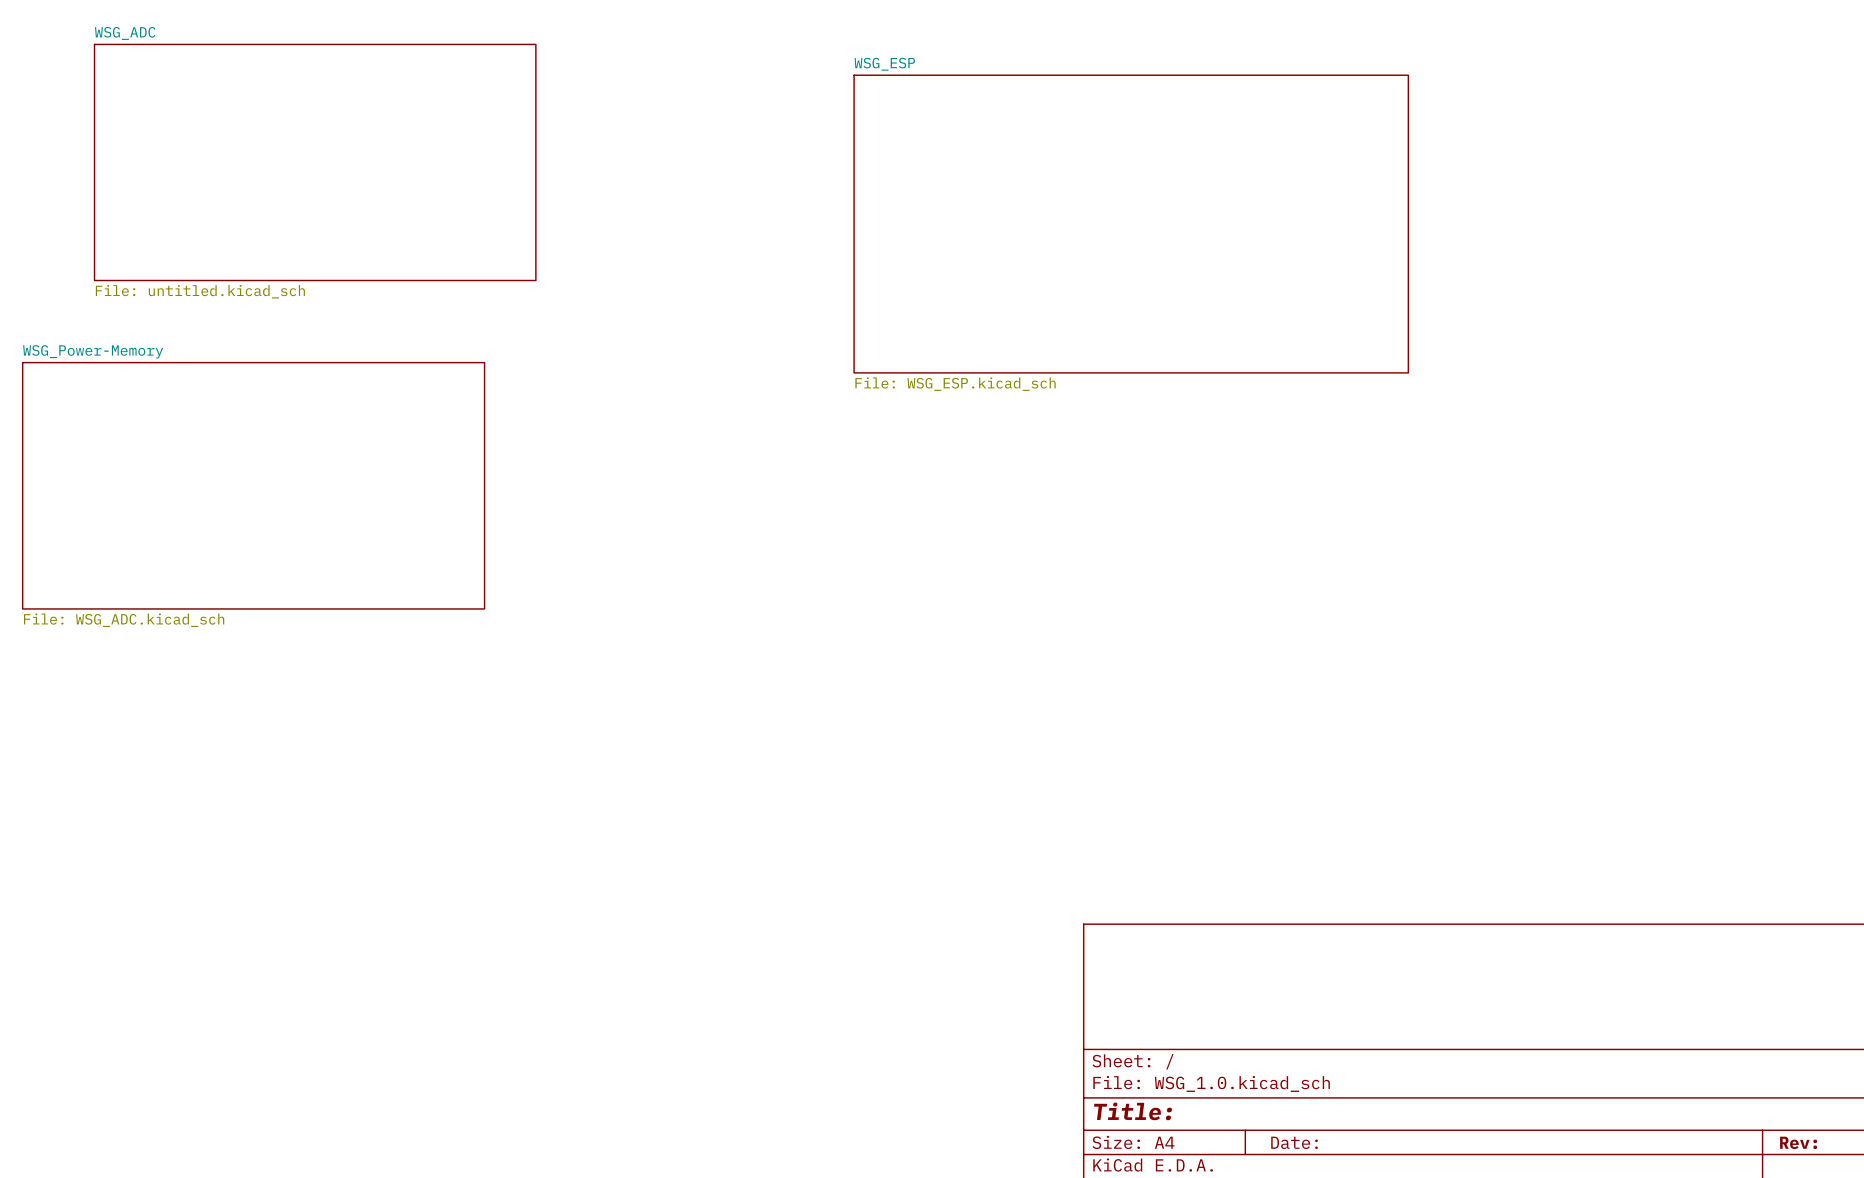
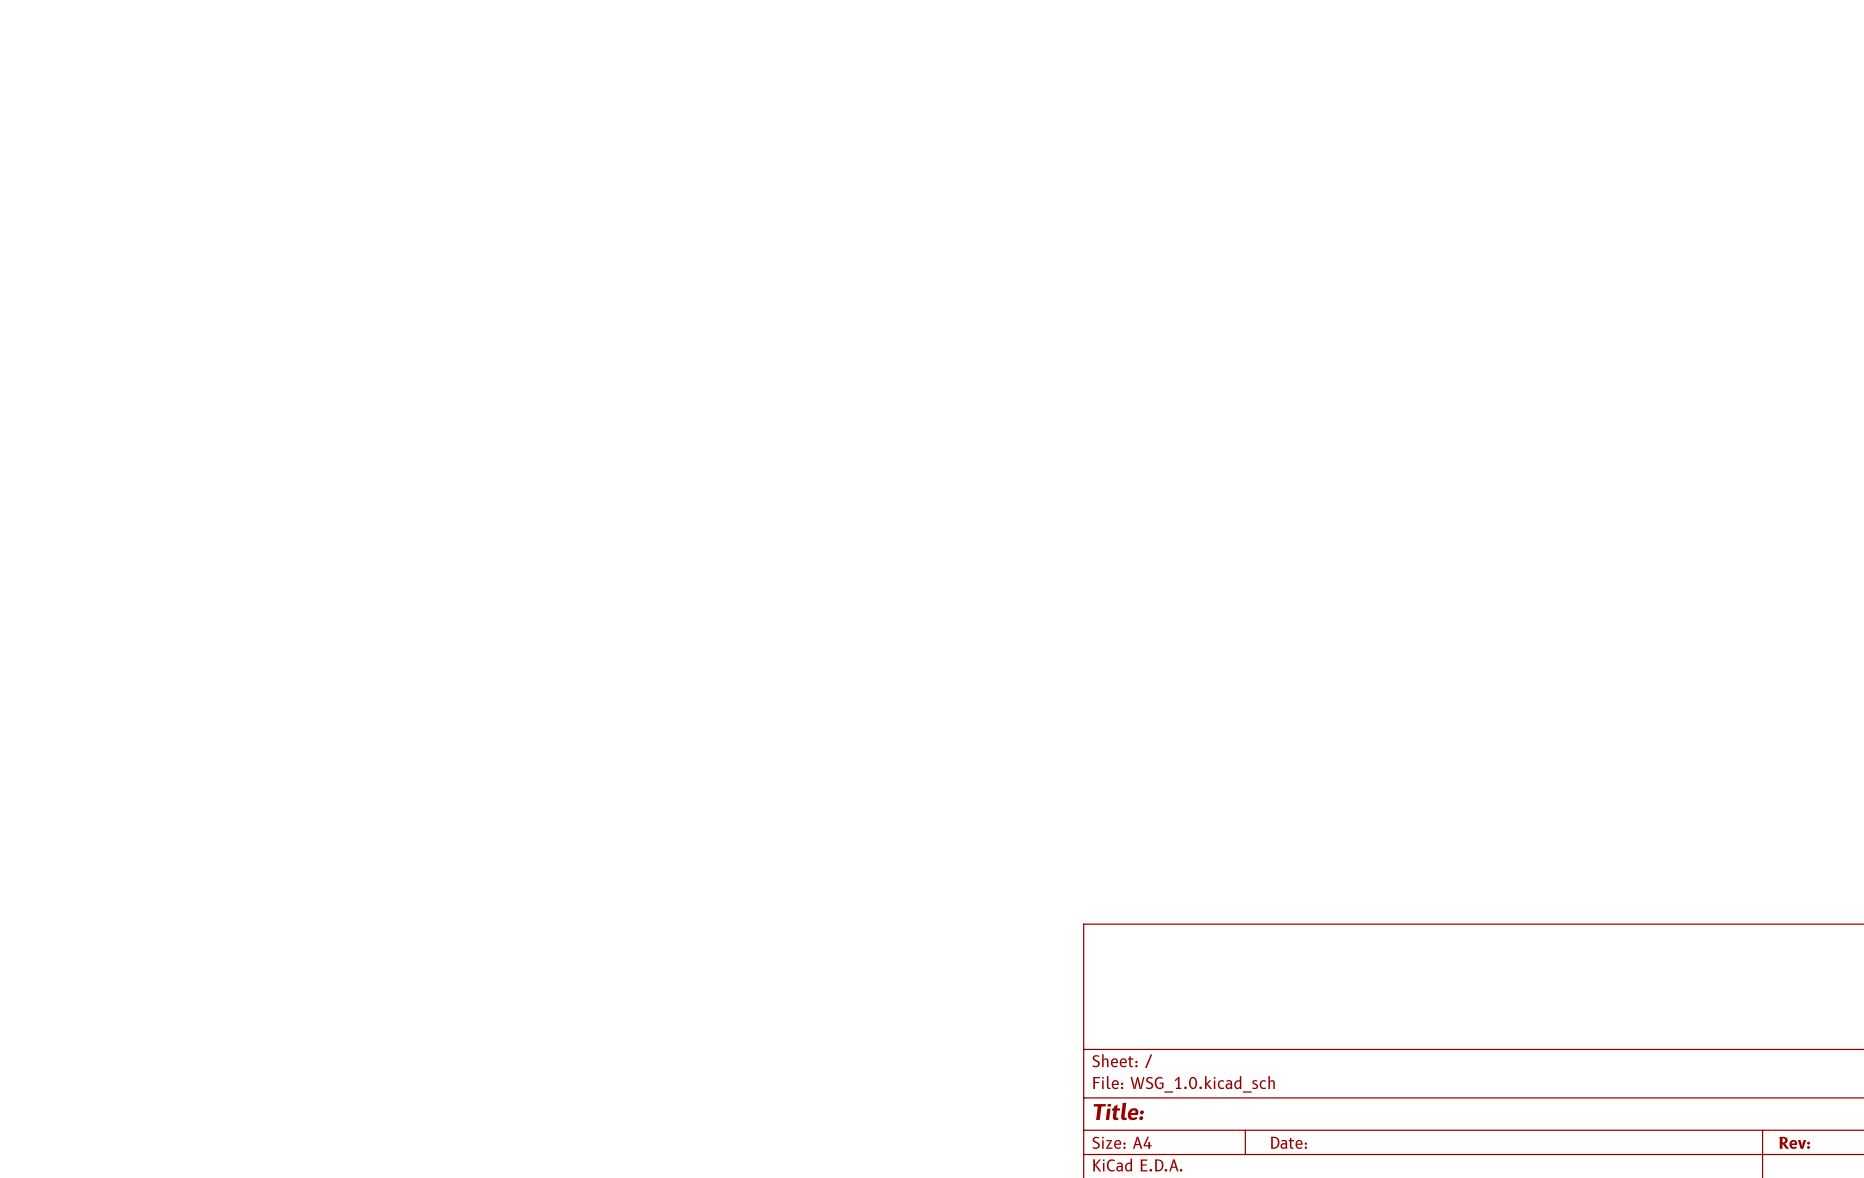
sheet WSG_ADC: File: untitled.kicad_sch (315, 162) -> none
sheet WSG_ESP: File: WSG_ESP.kicad_sch (1131, 224) -> none
sheet WSG_Power-Memory: File: WSG_ADC.kicad_sch (253, 485) -> none

